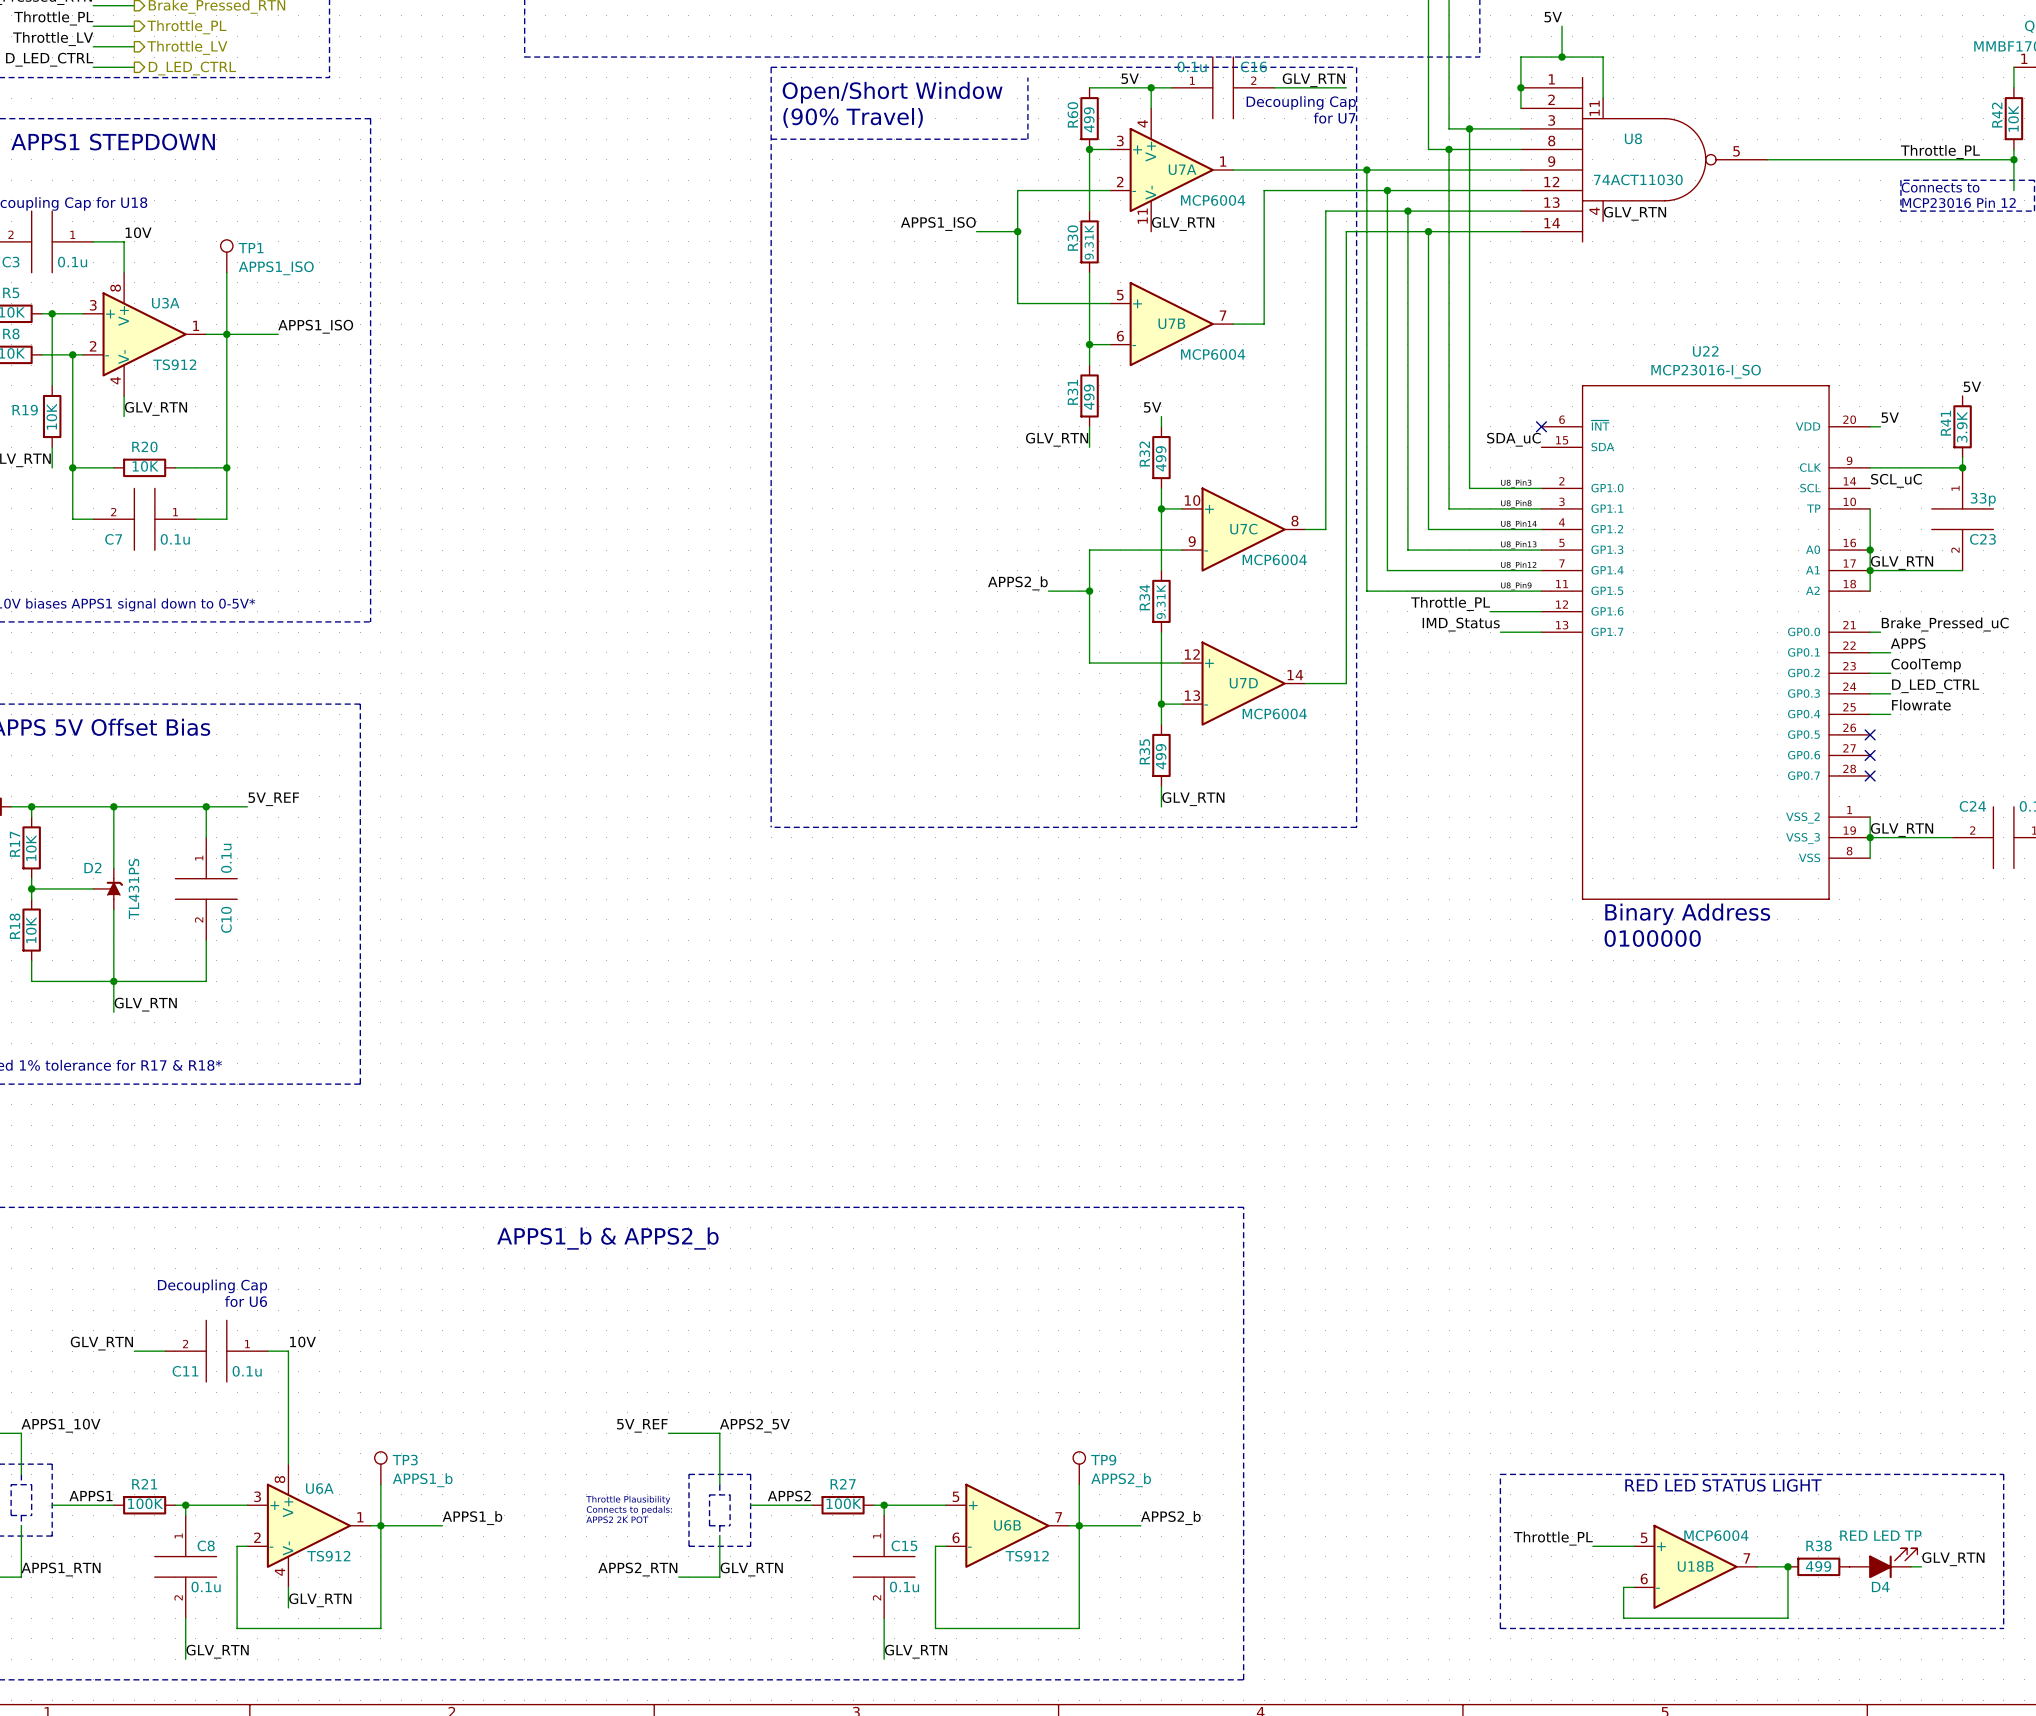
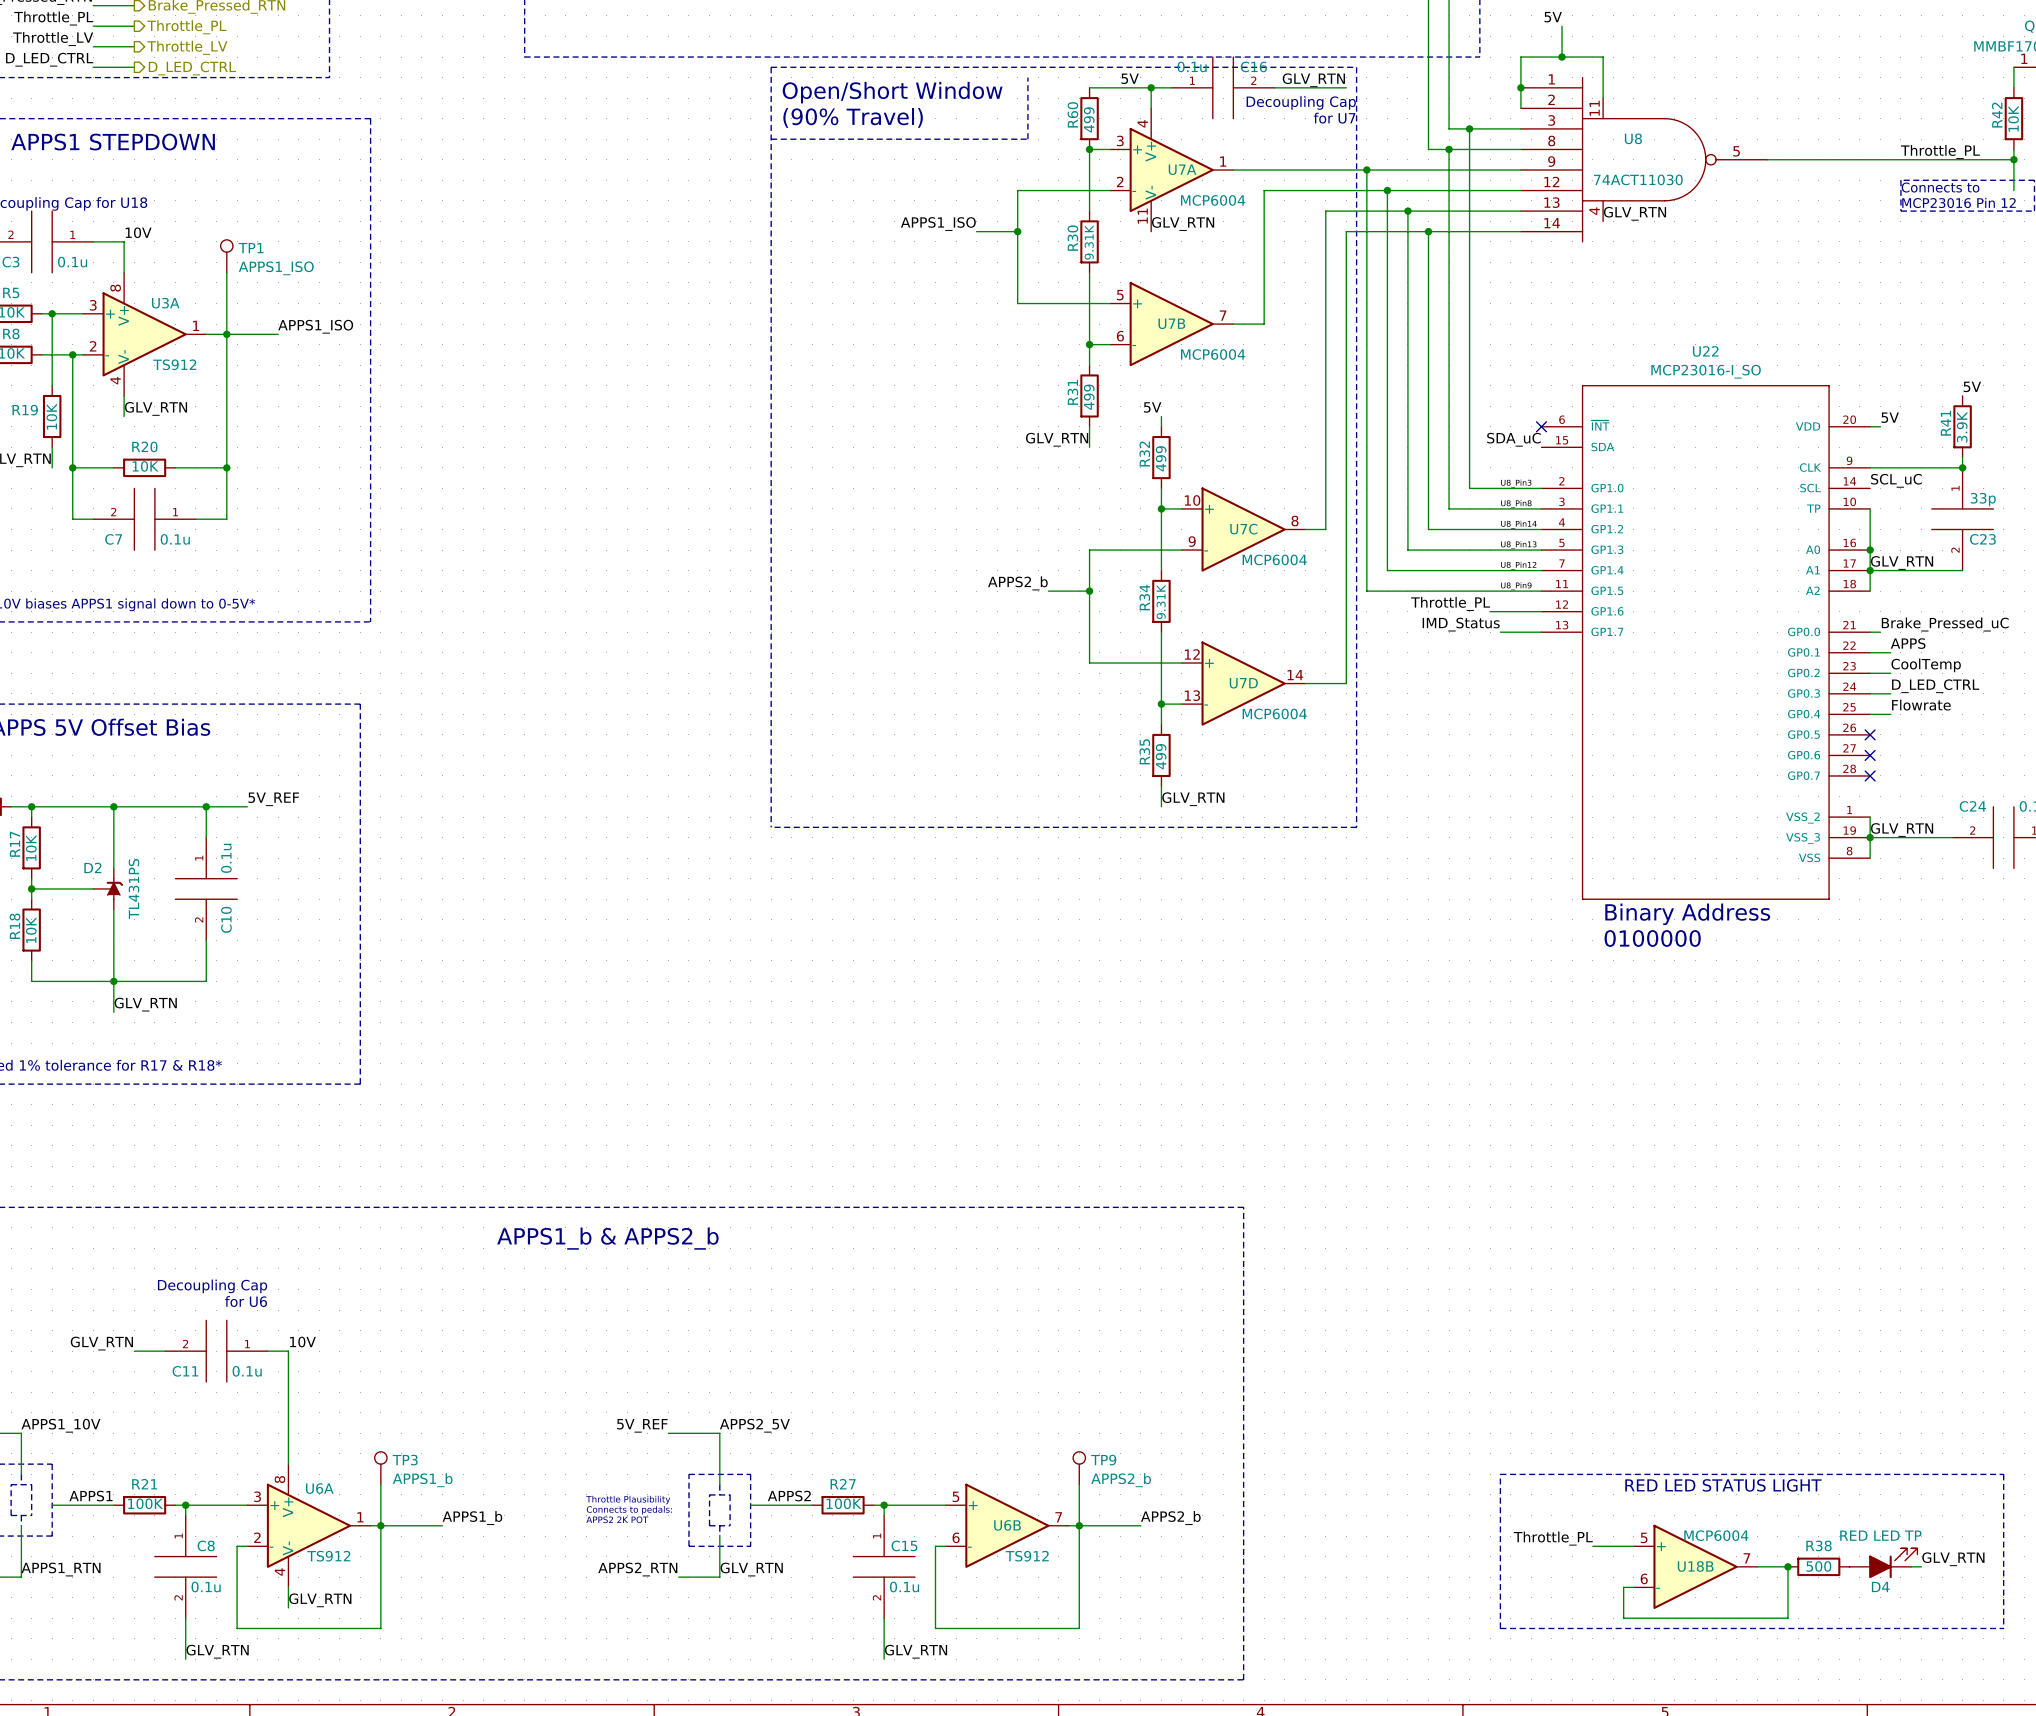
R38 value: 499 (1818, 1566) -> 500 (1818, 1566)

